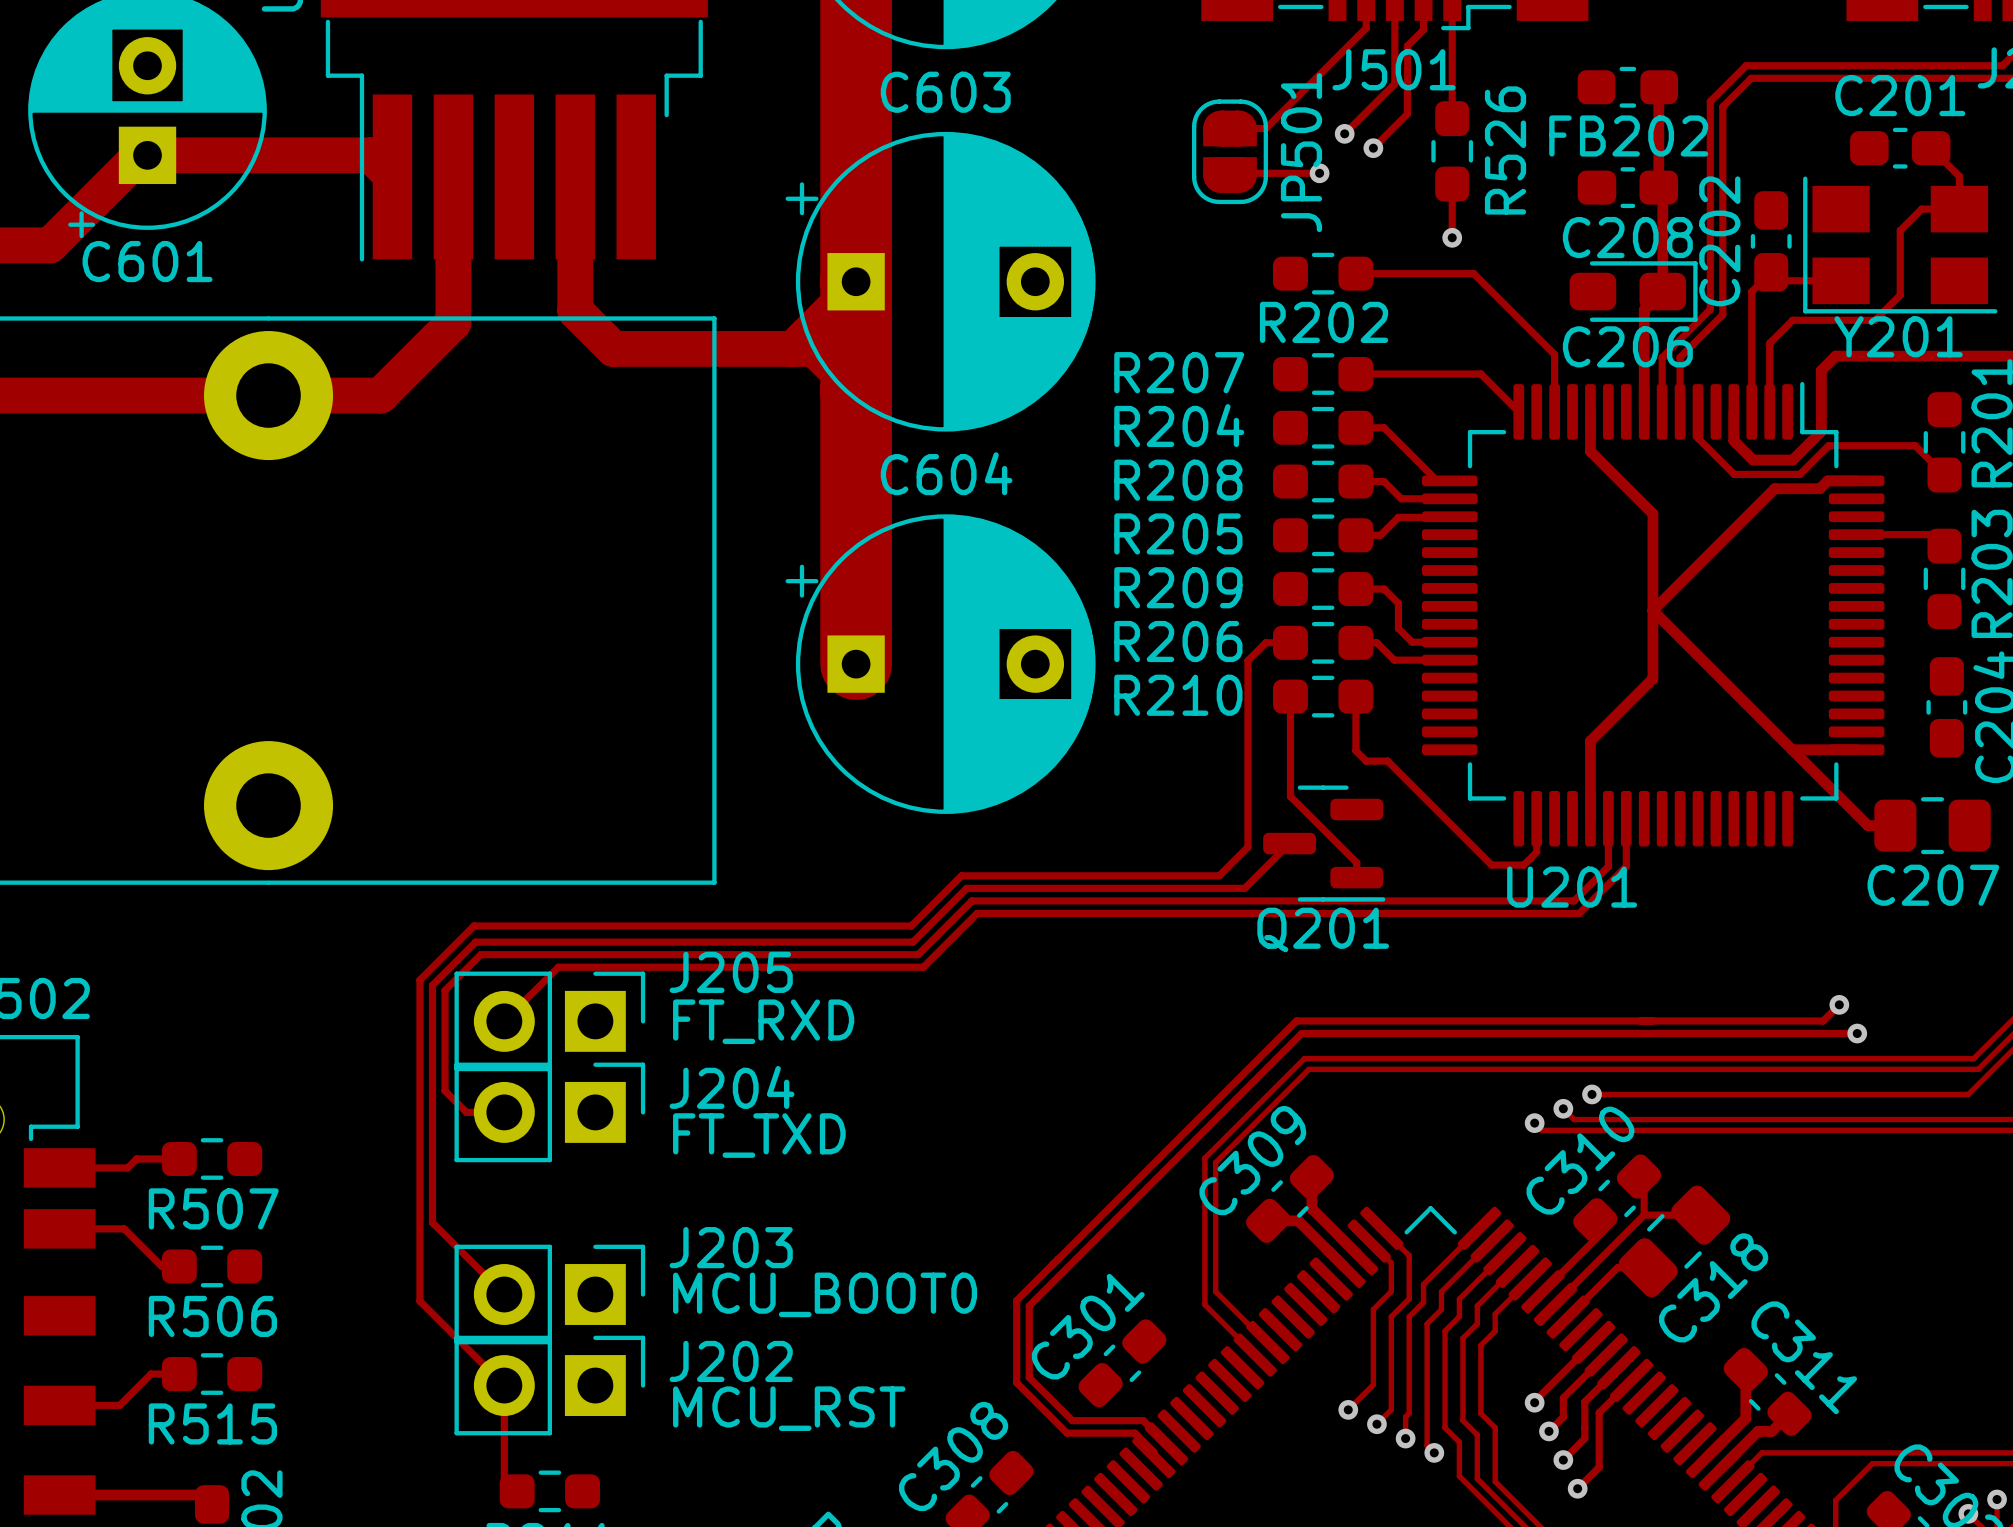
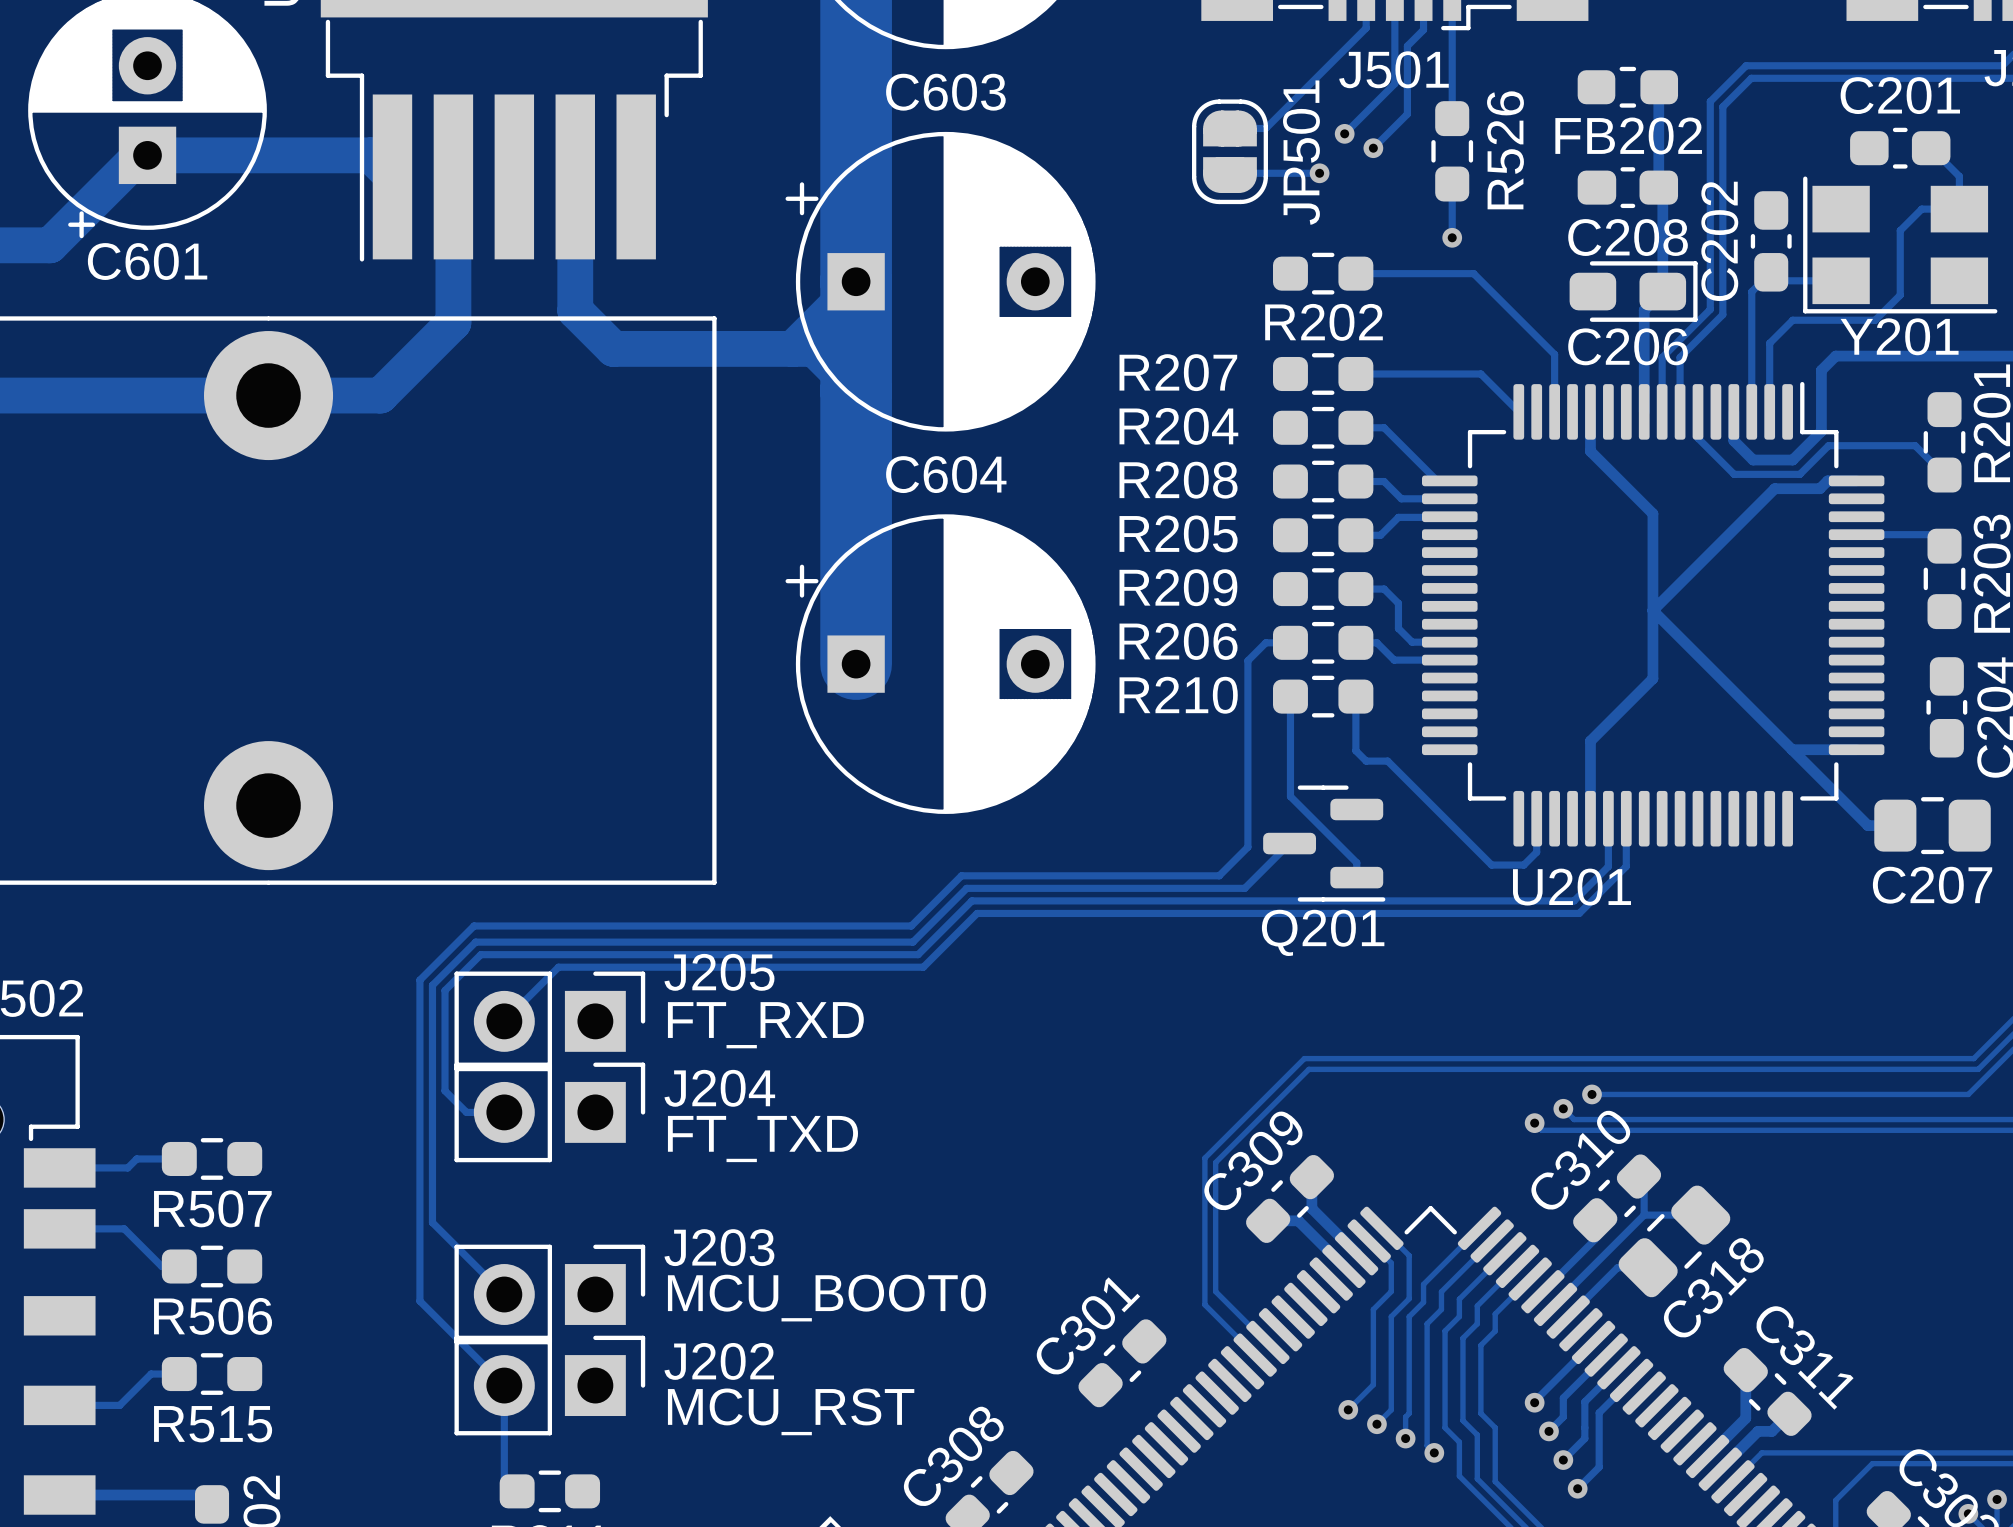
track: (1839, 1004) (1823, 1020) (1296, 1020) (1016, 1300) (1016, 1382) (1067, 1433) (1135, 1433) (1153, 1451) (1153, 1456) -> none
via: (1839, 1004) -> none
track: (1857, 1033) (1301, 1033) (1029, 1305) (1029, 1377) (1072, 1420) (1143, 1420) (1166, 1443) -> none
via: (1857, 1033) -> none

